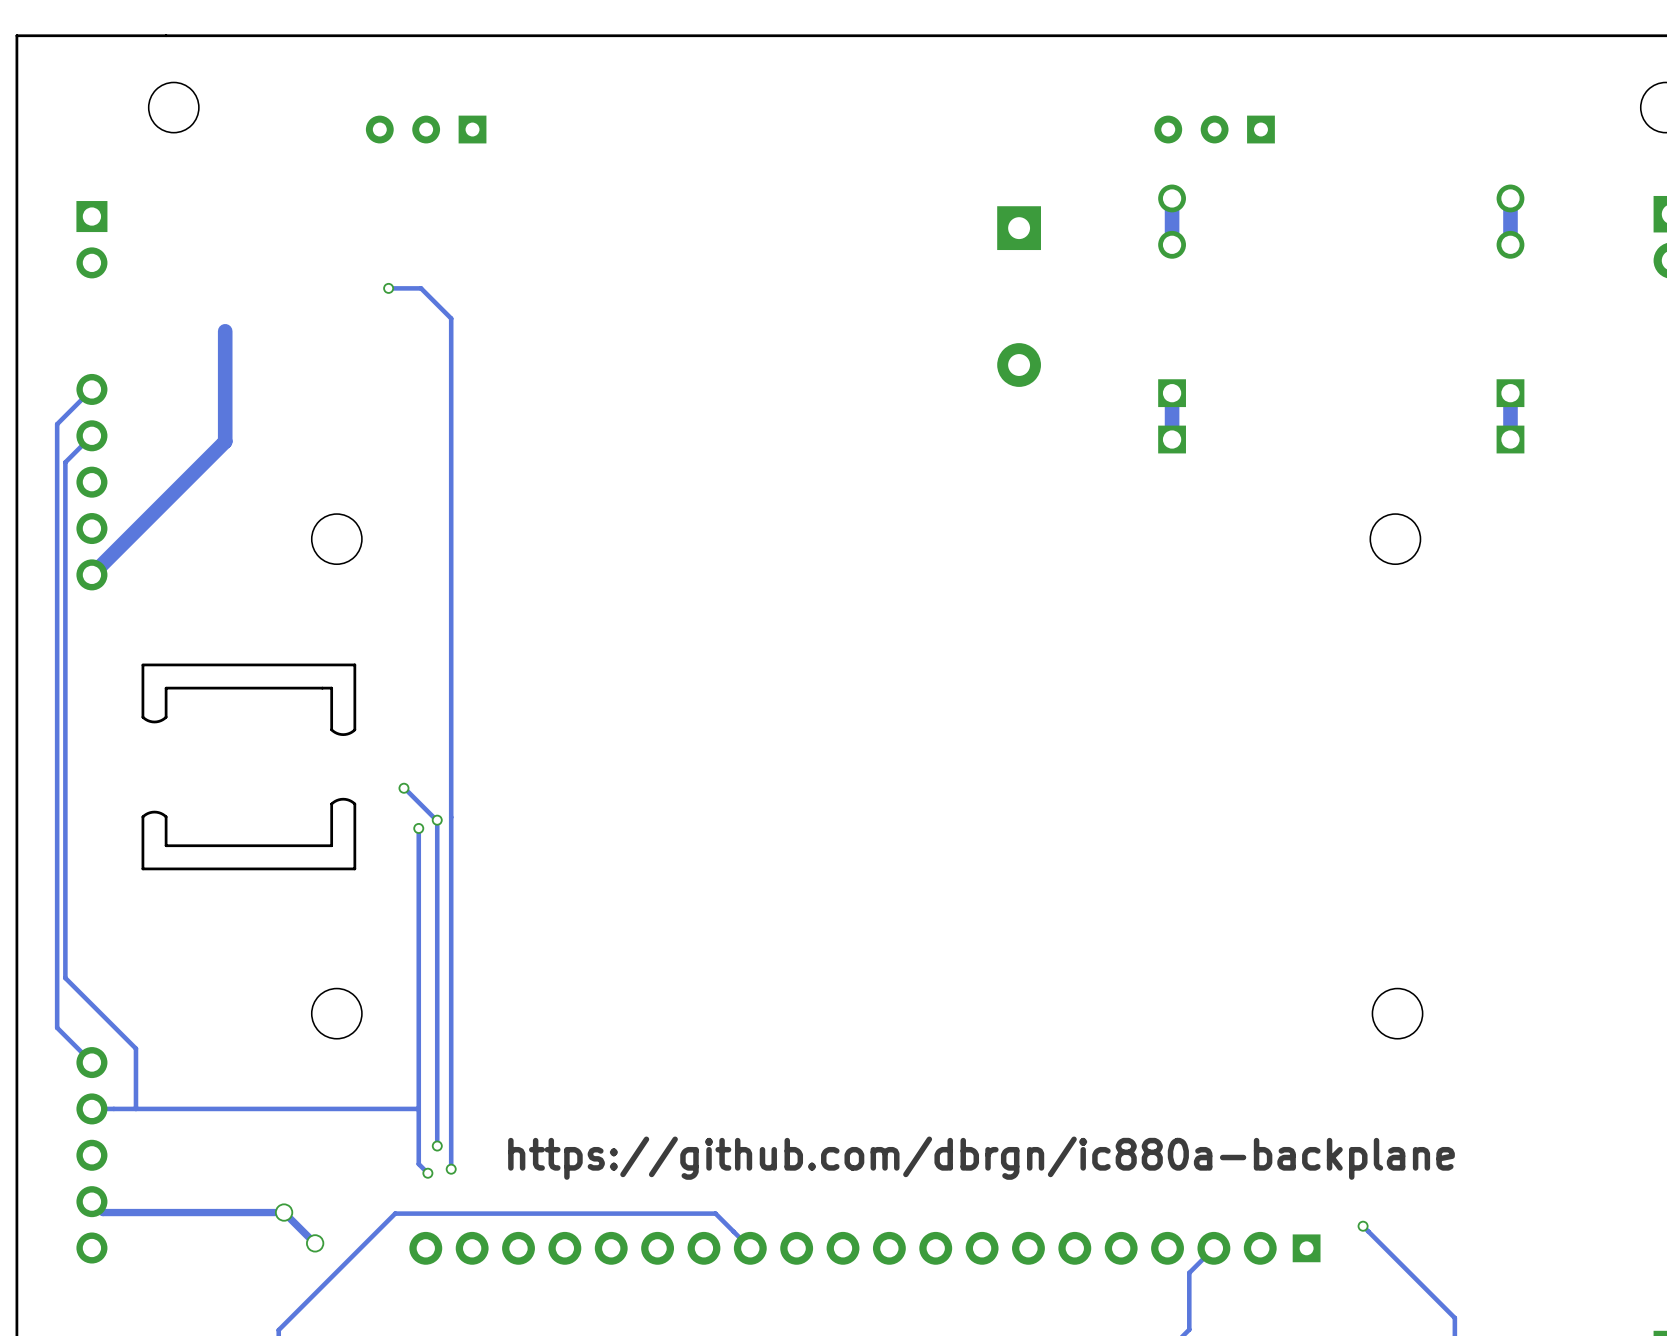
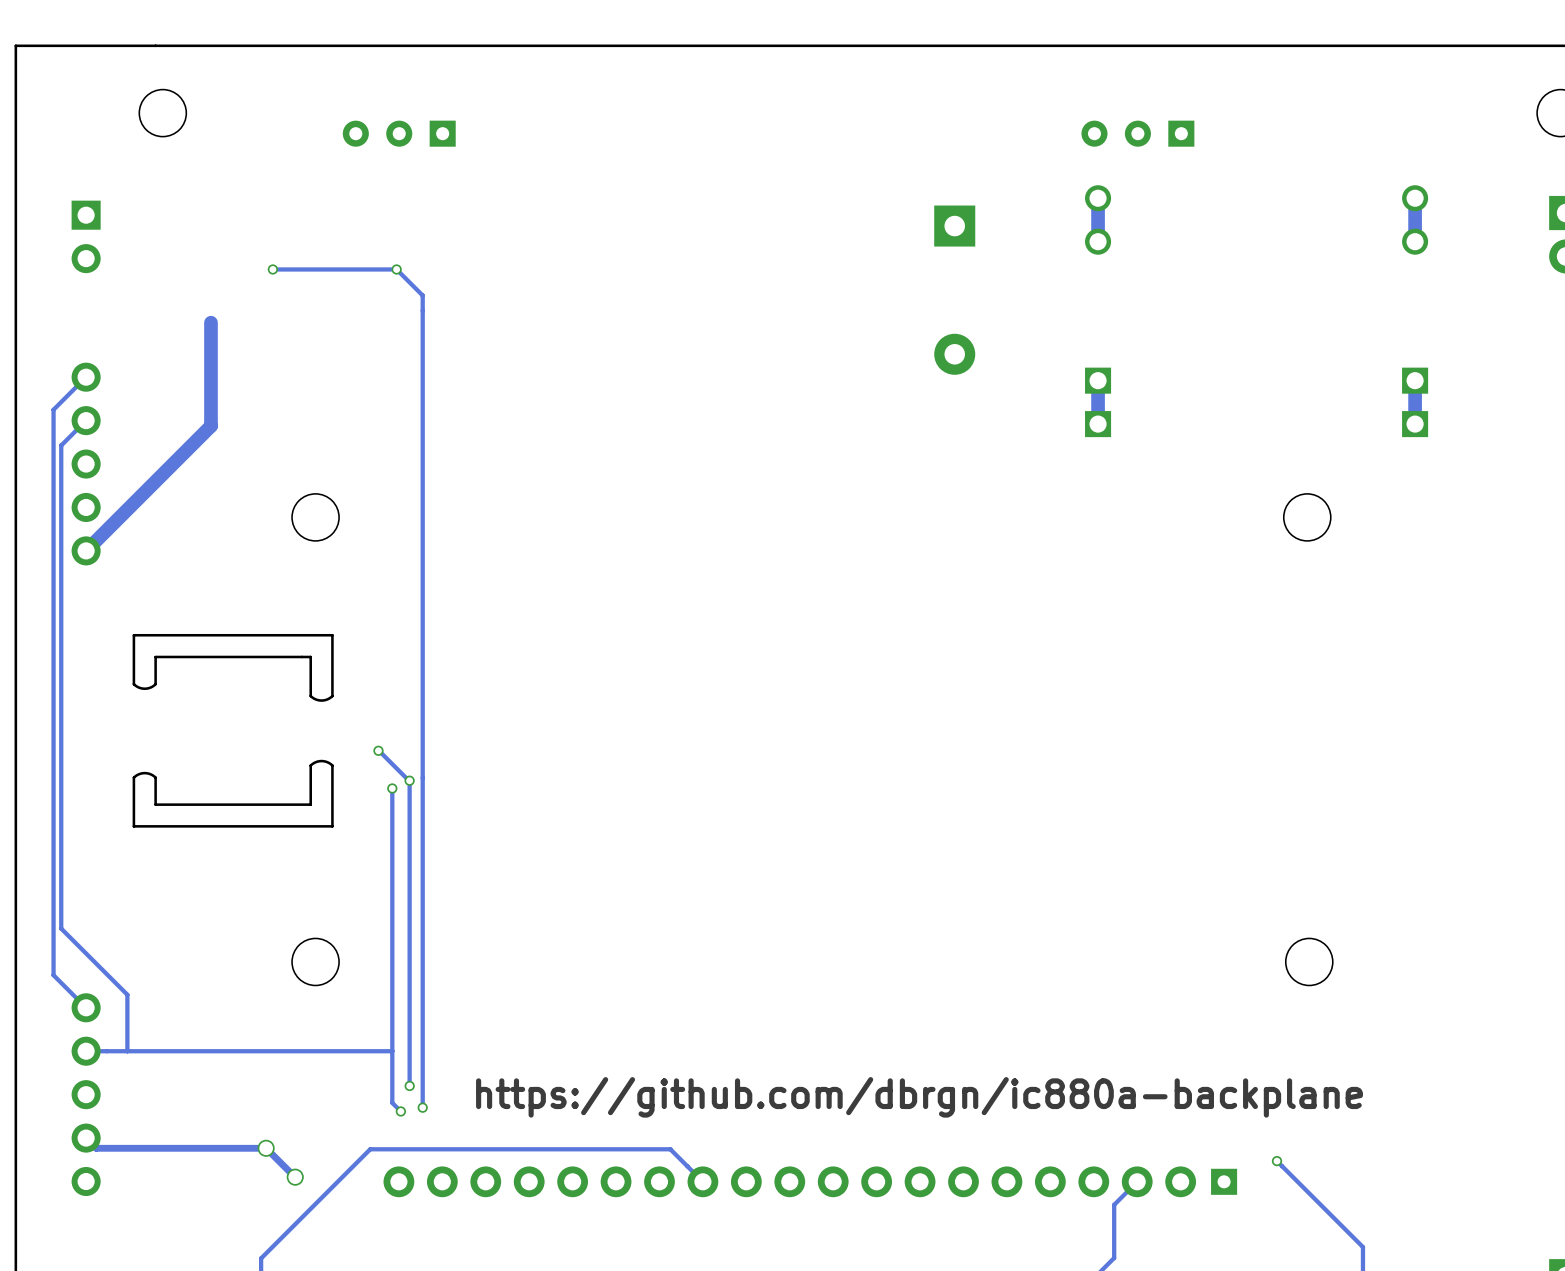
via: none -> (272, 269)
track: (388, 288) (421, 288) (451, 318) -> (272, 269) (396, 269) (422, 295) (422, 310)
via position: (388, 288) -> (396, 269)

